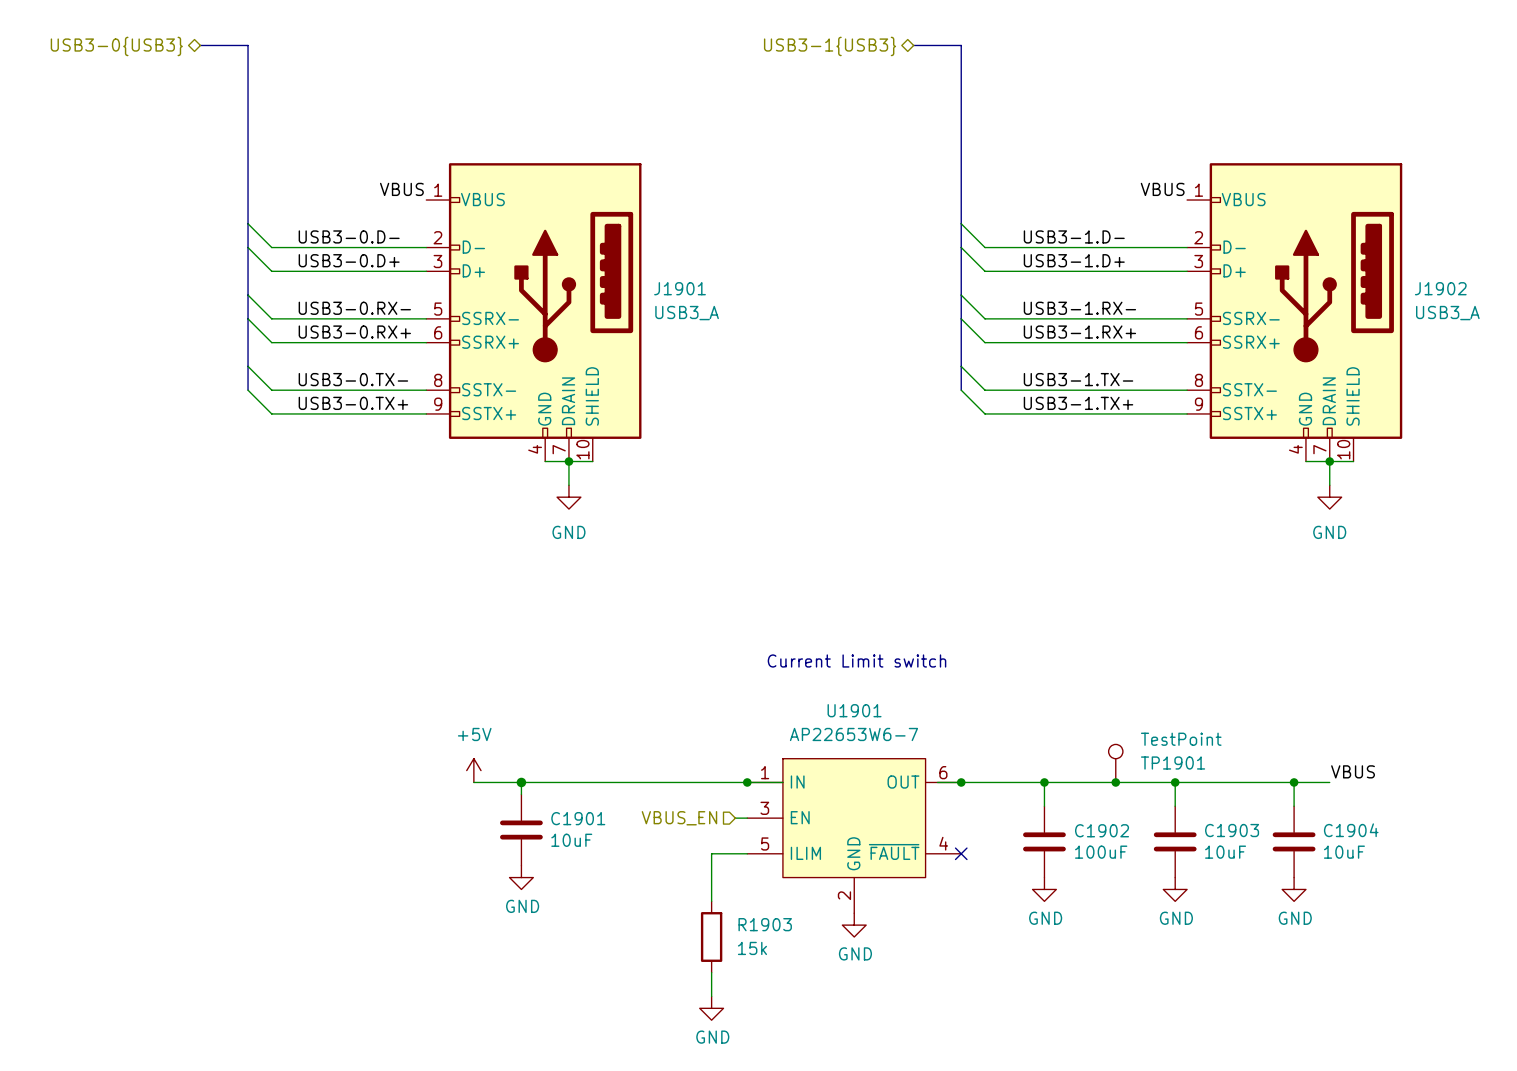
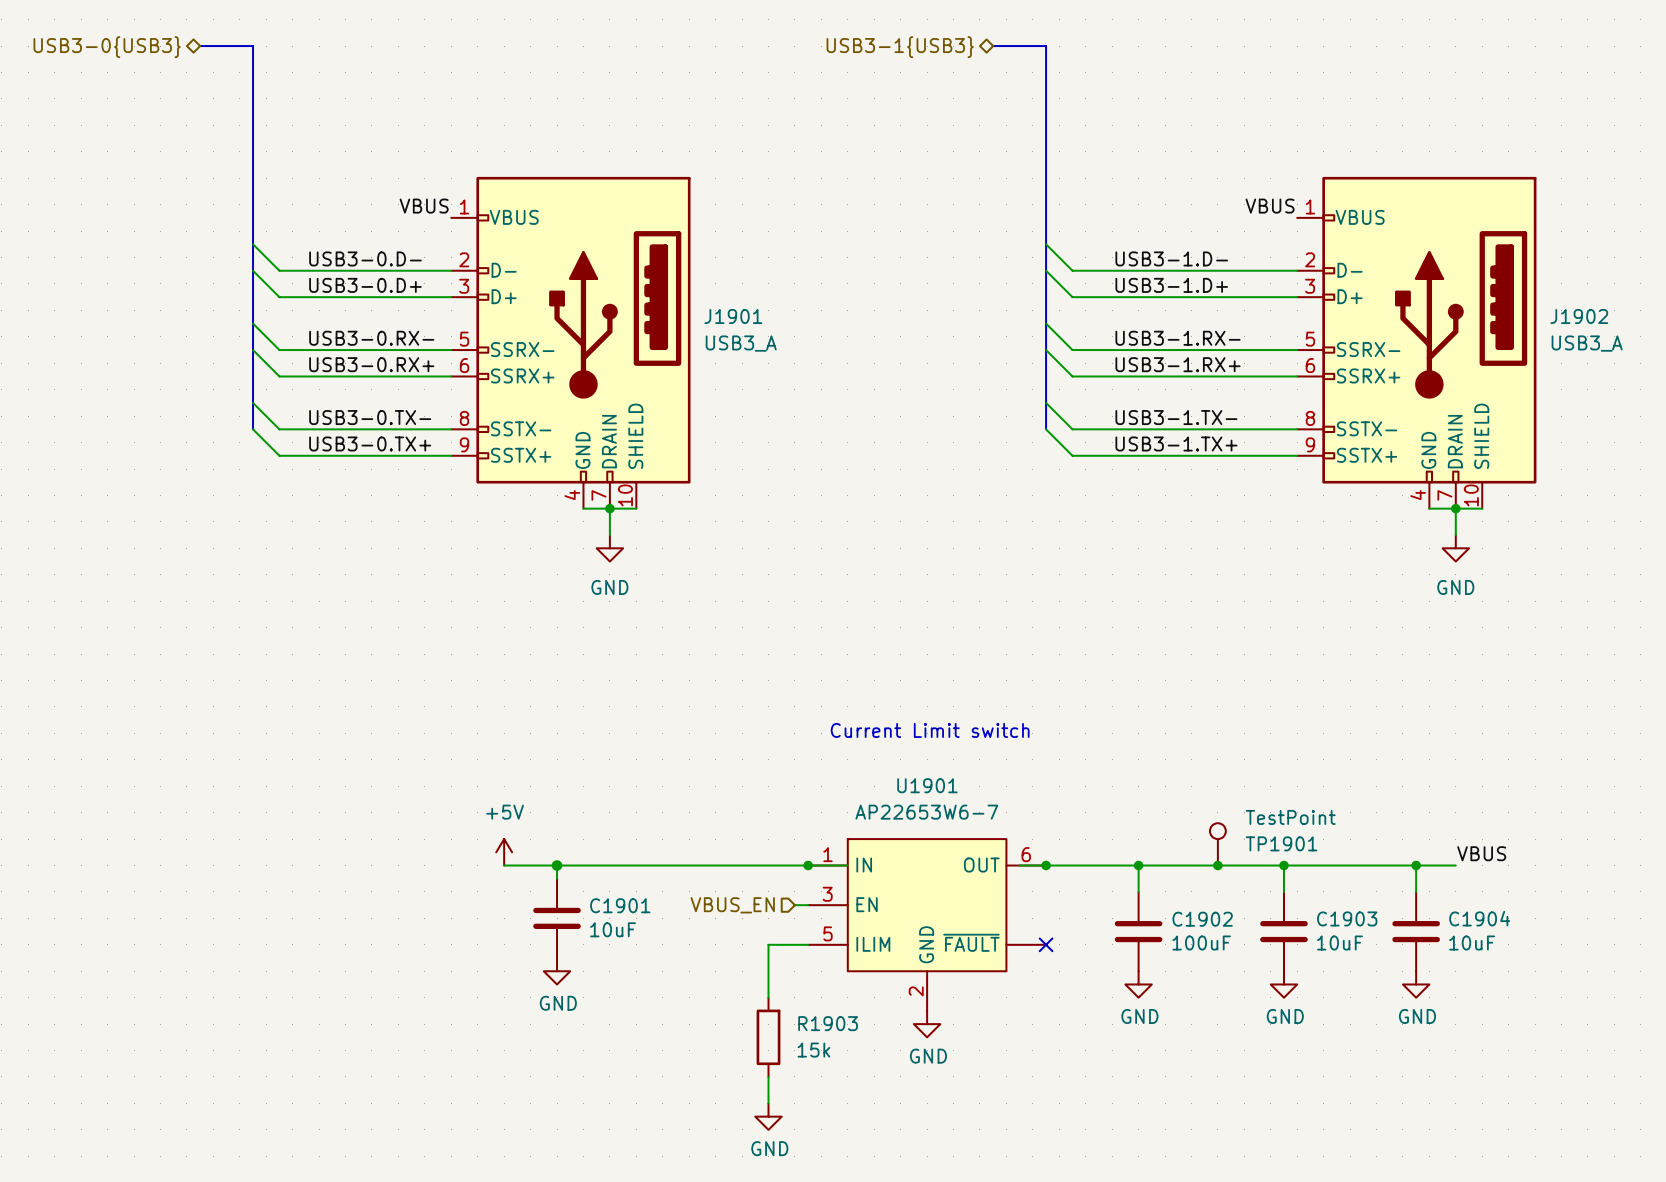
U1901 pin number: 4 (943, 843) -> none

